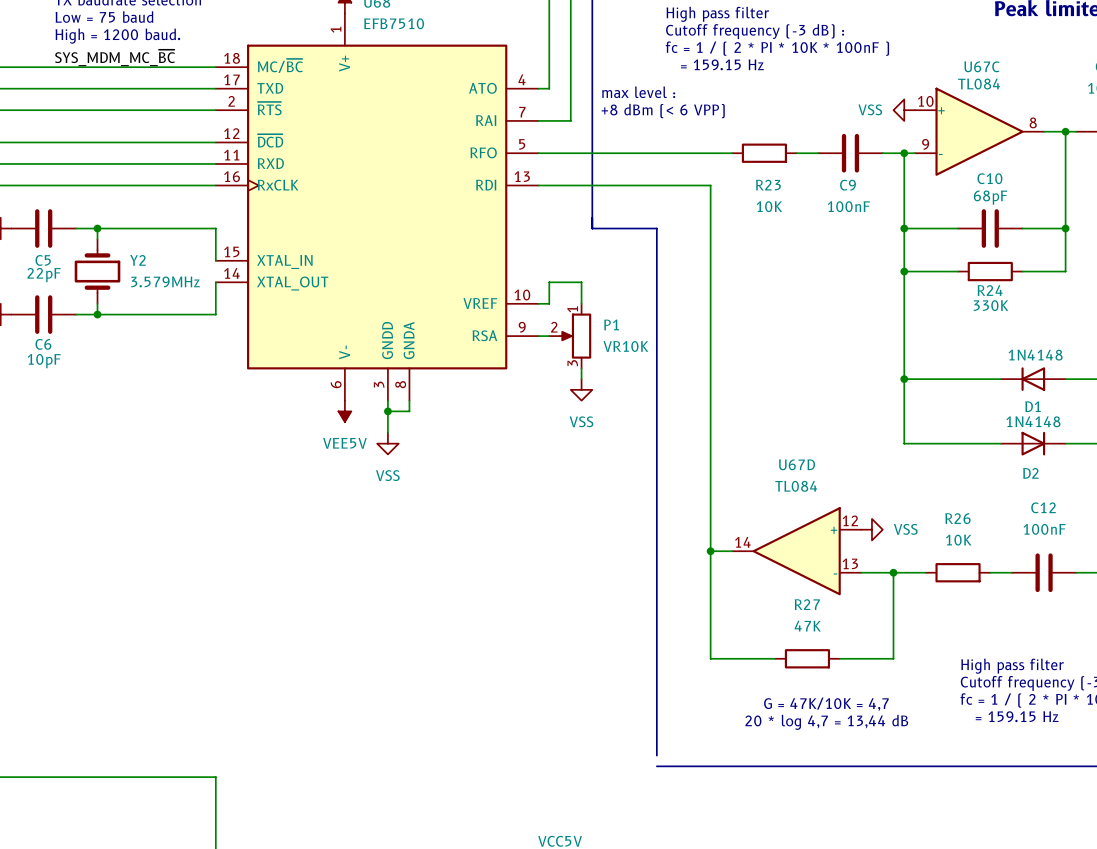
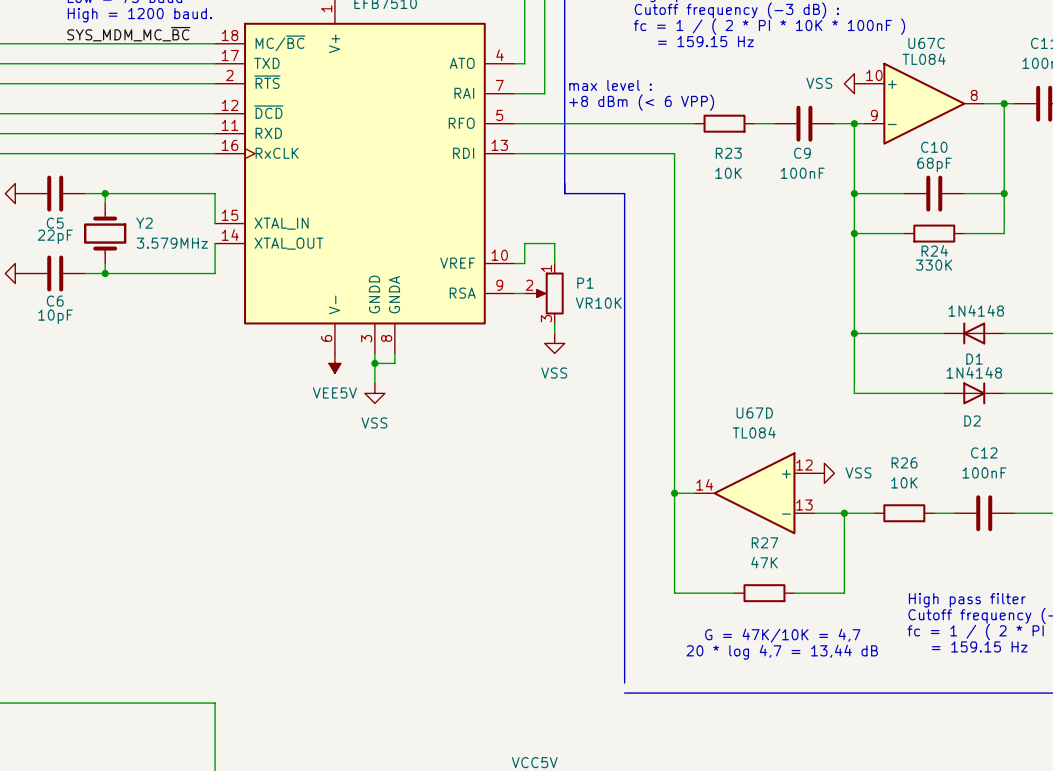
text: max level : (638, 92) -> none
text: +8 dBm (< 6 VPP) (663, 111) -> max level : (610, 85)
text: none -> +8 dBm (< 6 VPP) (641, 102)

